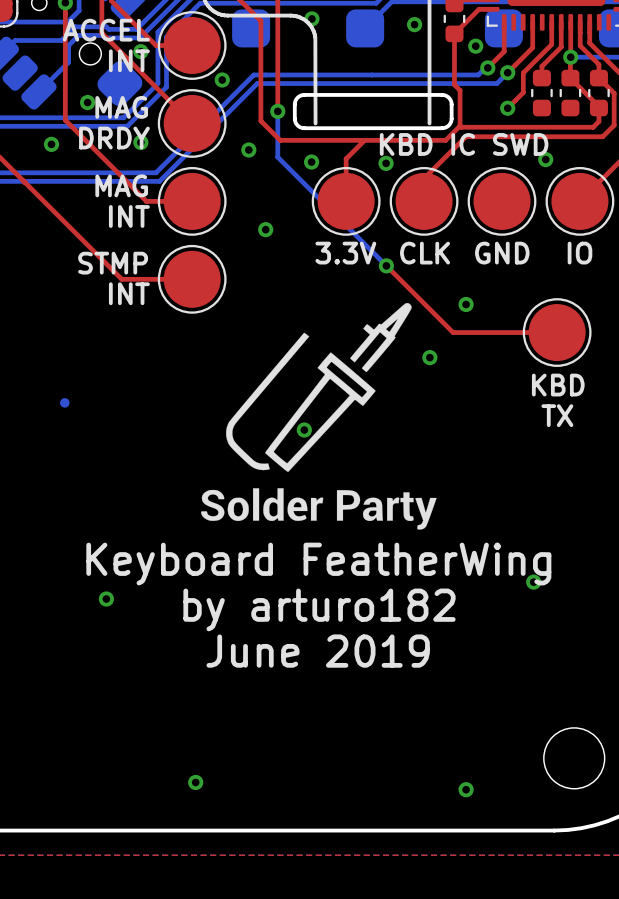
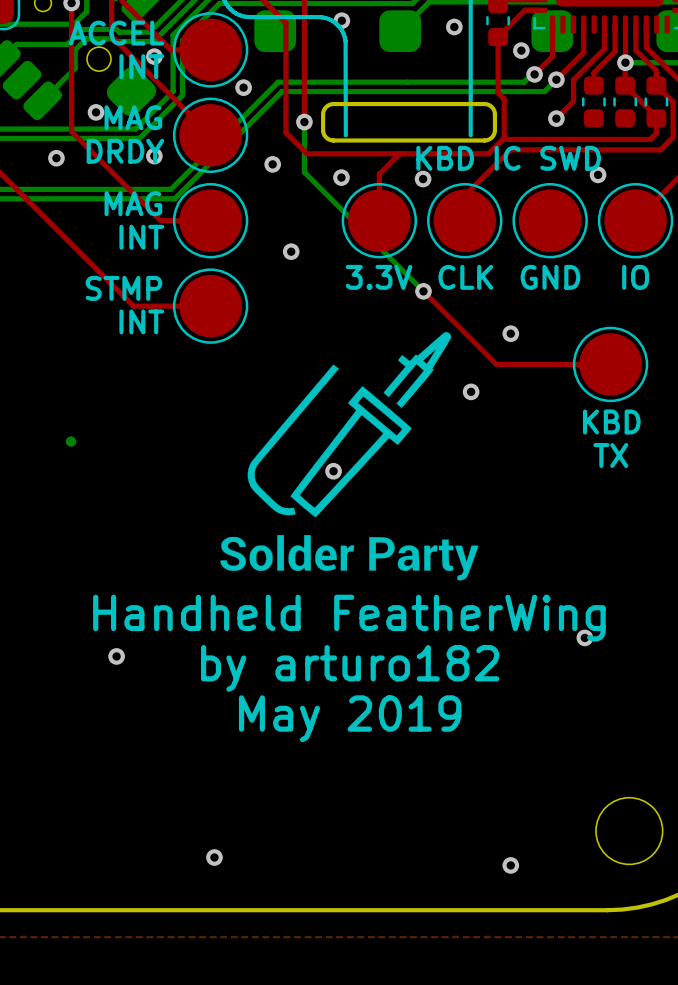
text: Keyboard FeatherWing (318, 564) -> Handheld FeatherWing (349, 618)
text: June 2019 (318, 651) -> May 2019 (350, 718)

